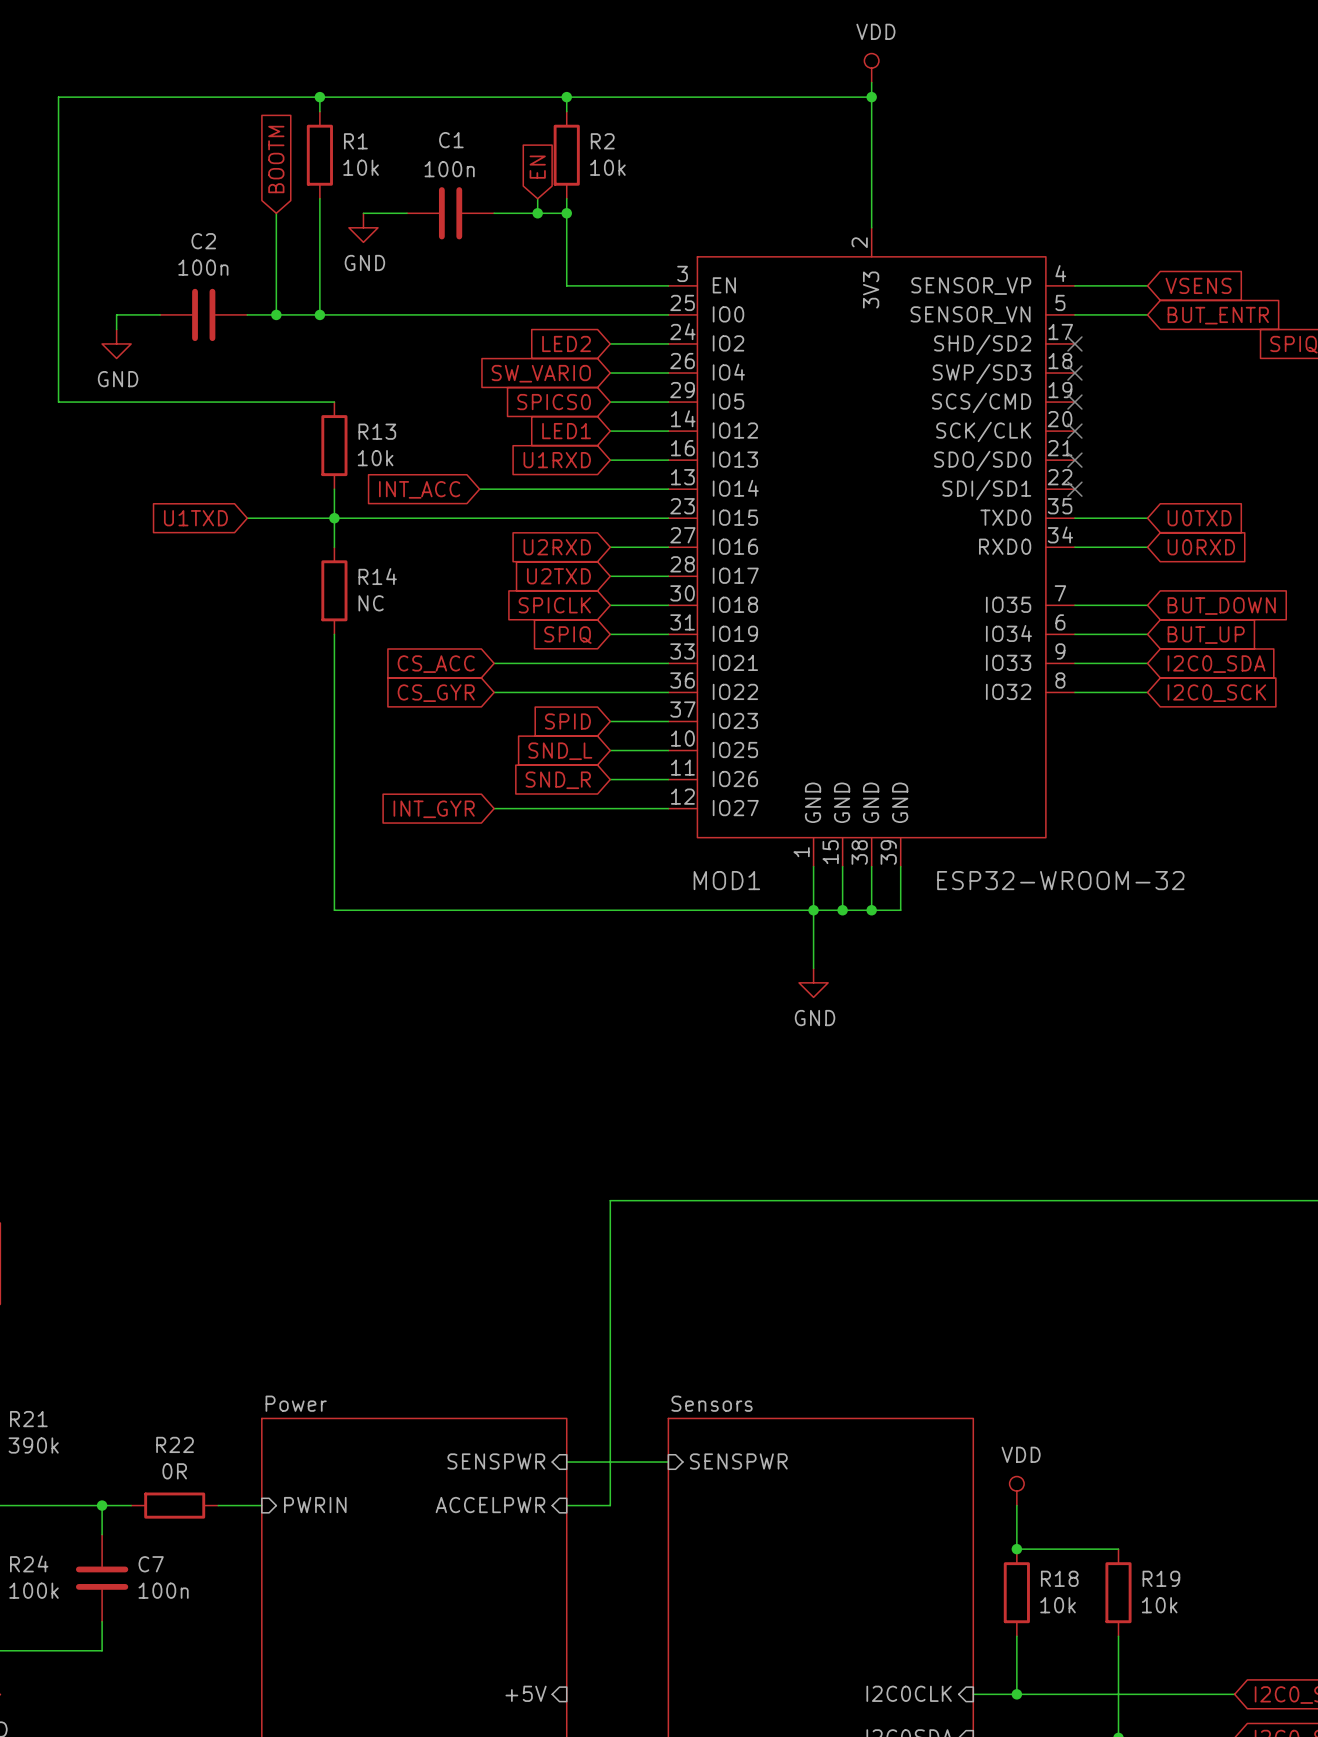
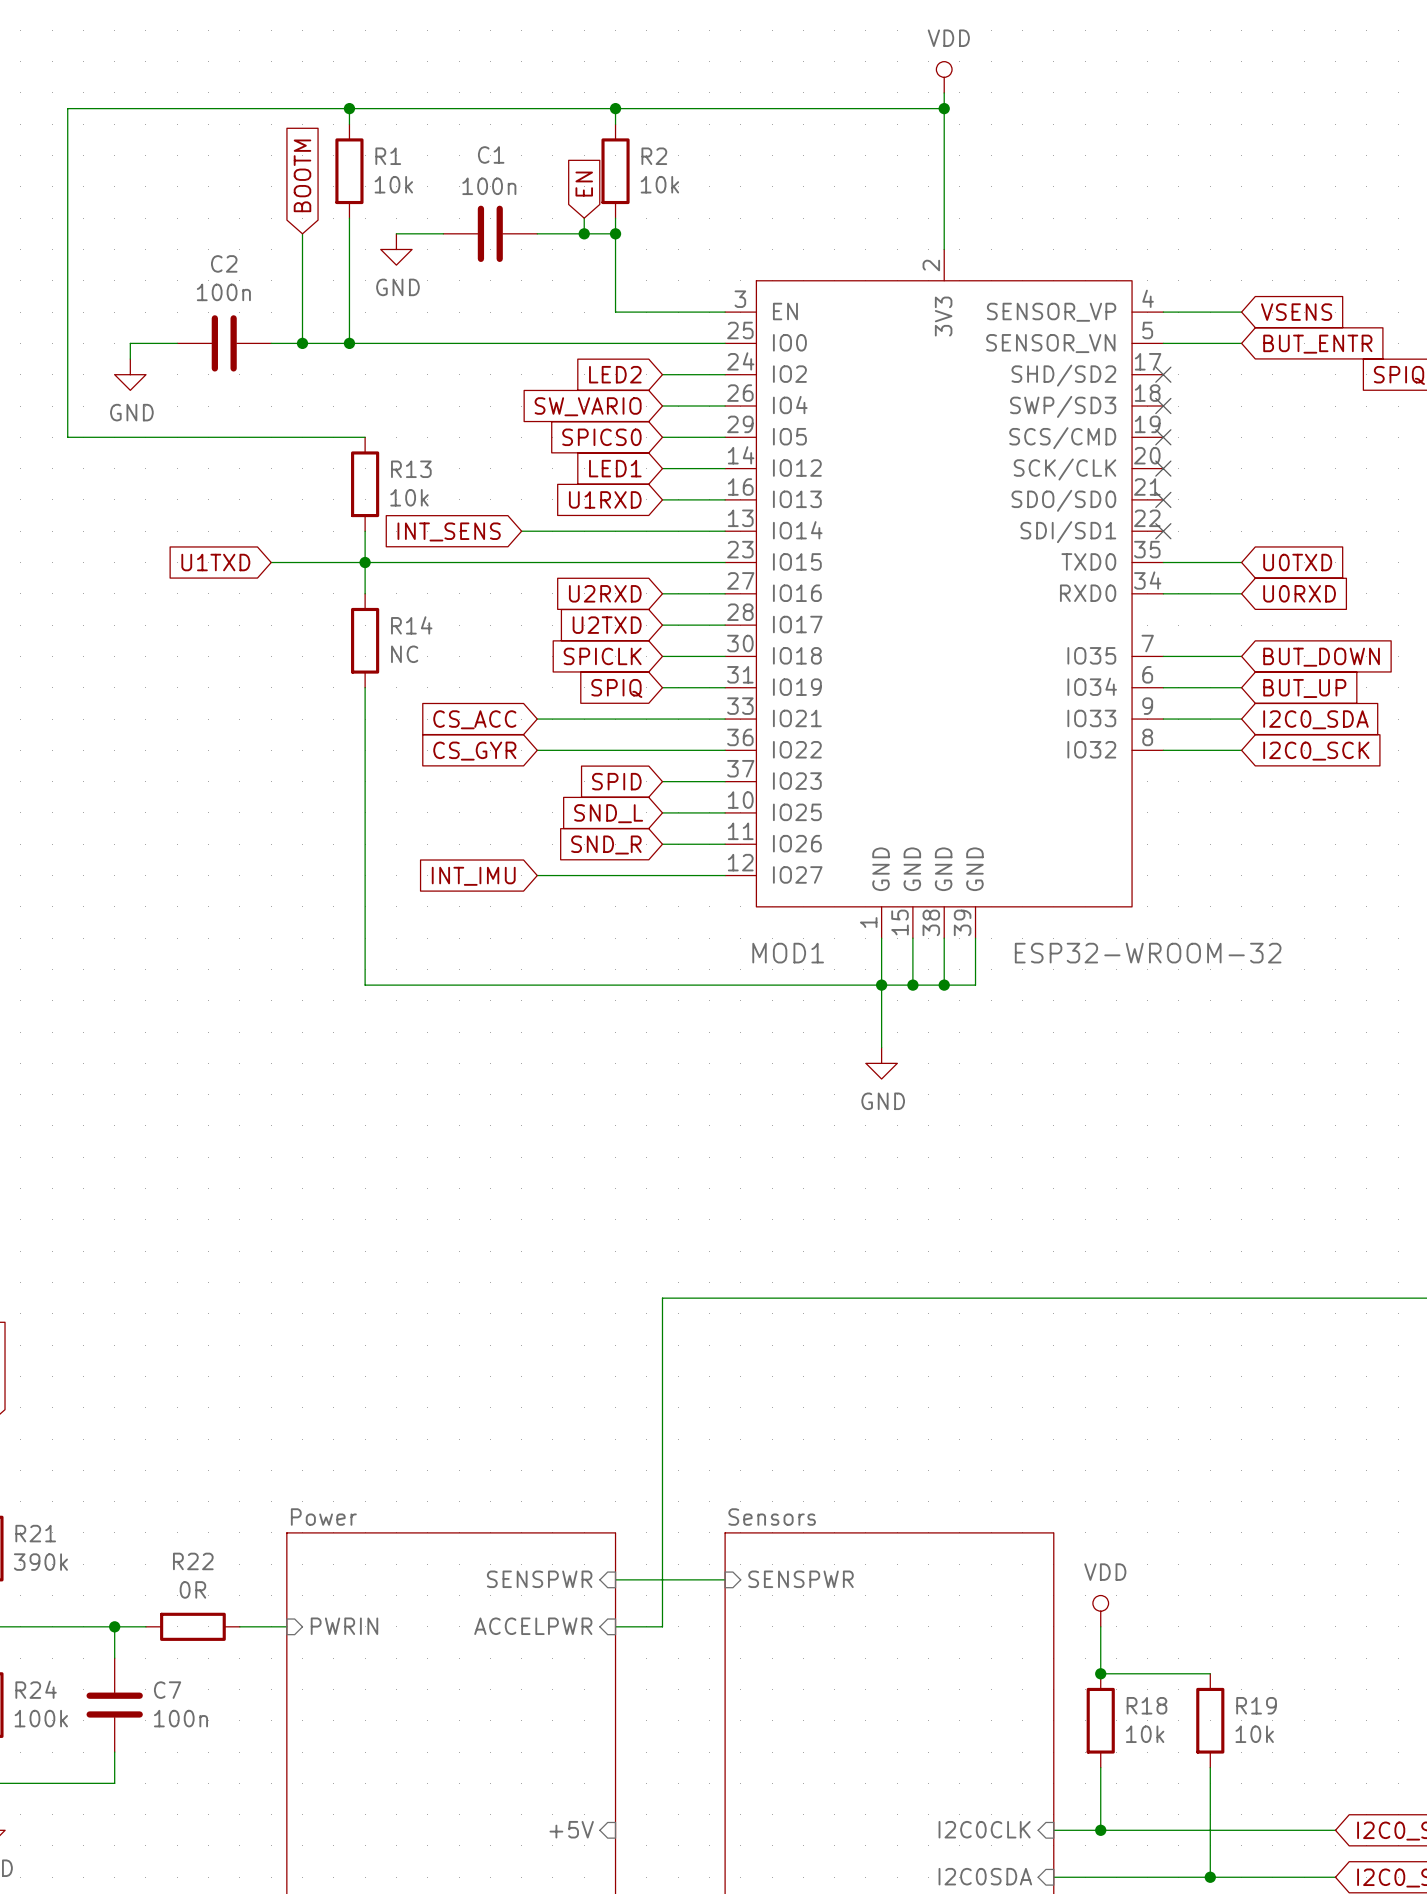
global label: INT_ACC (419, 489) -> INT_SENS (449, 531)
global label: INT_GYR (434, 809) -> INT_IMU (473, 876)

